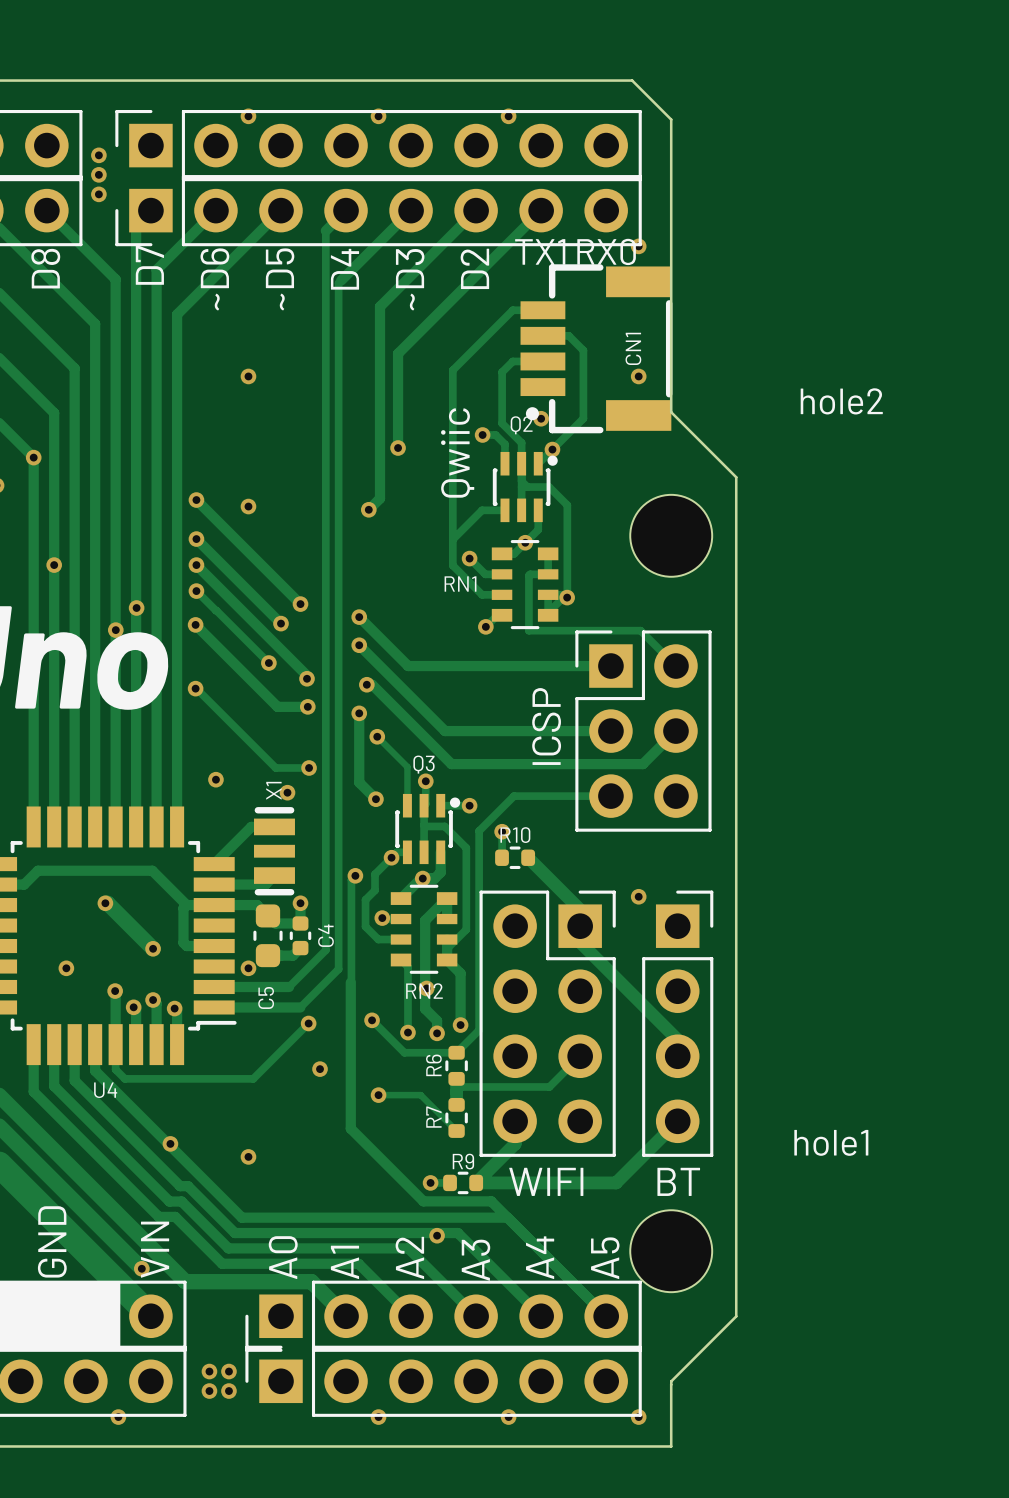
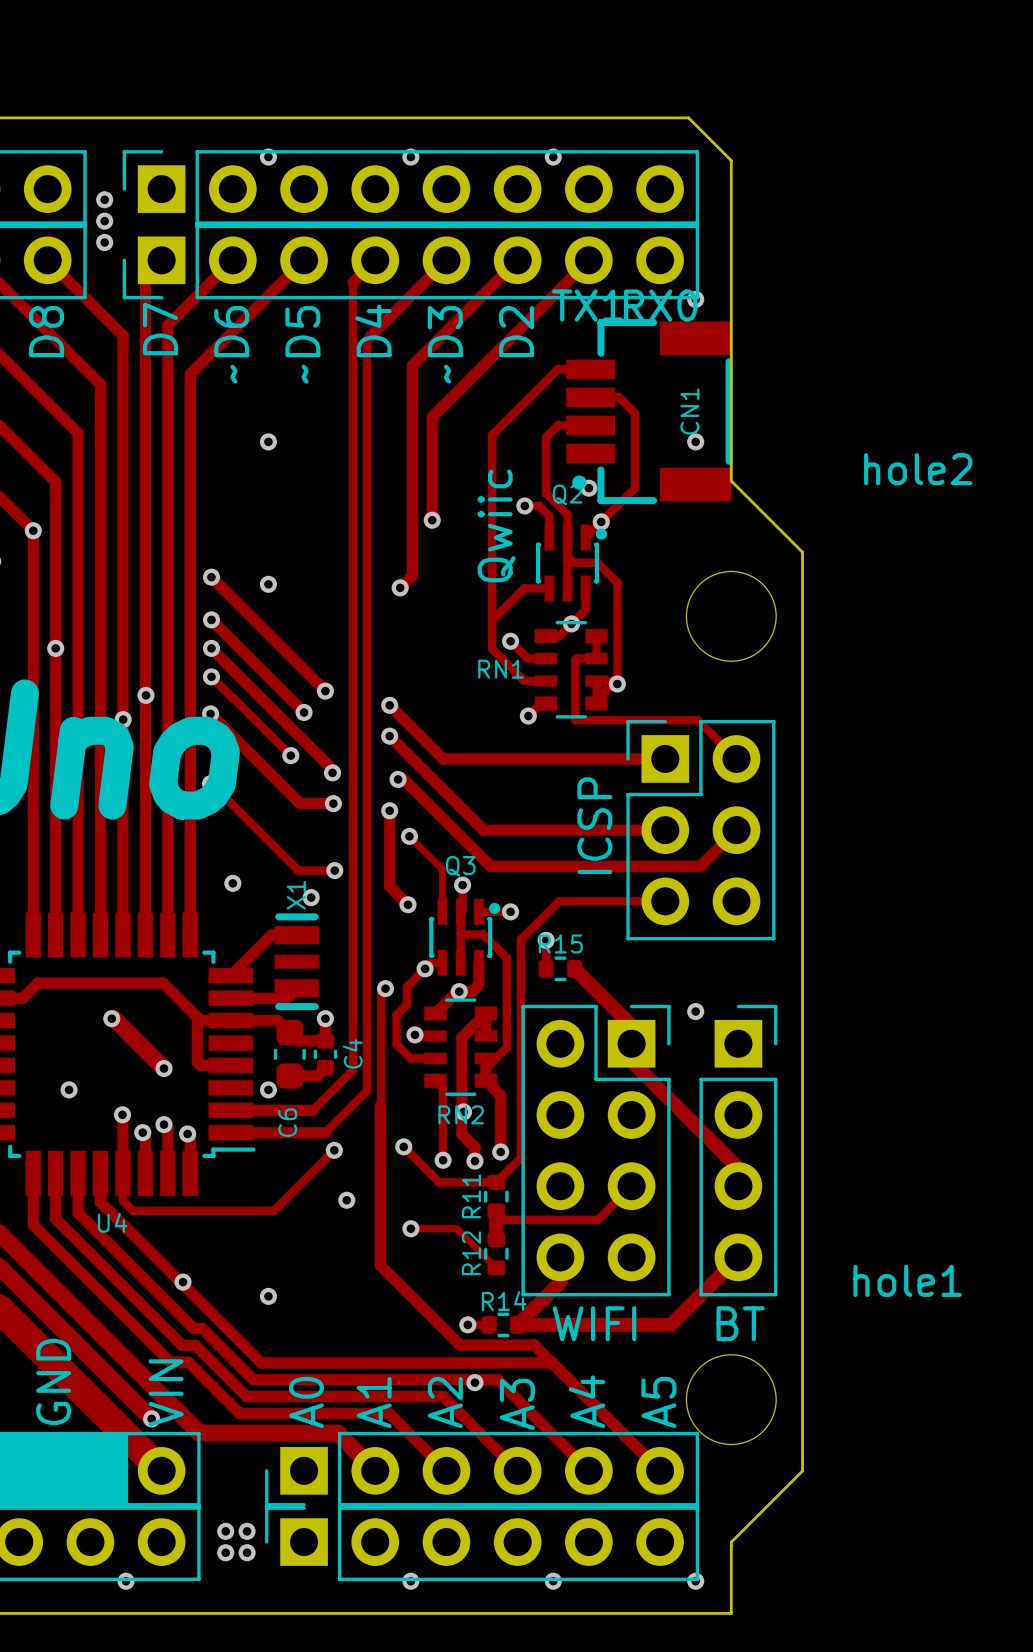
R10 name: R10 (515, 835) -> R15 (560, 943)
C5 name: C5 (266, 997) -> C6 (287, 1122)
R6 name: R6 (433, 1065) -> R11 (471, 1196)
R7 name: R7 (433, 1117) -> R12 (471, 1253)
R9 name: R9 (463, 1161) -> R14 (504, 1301)

